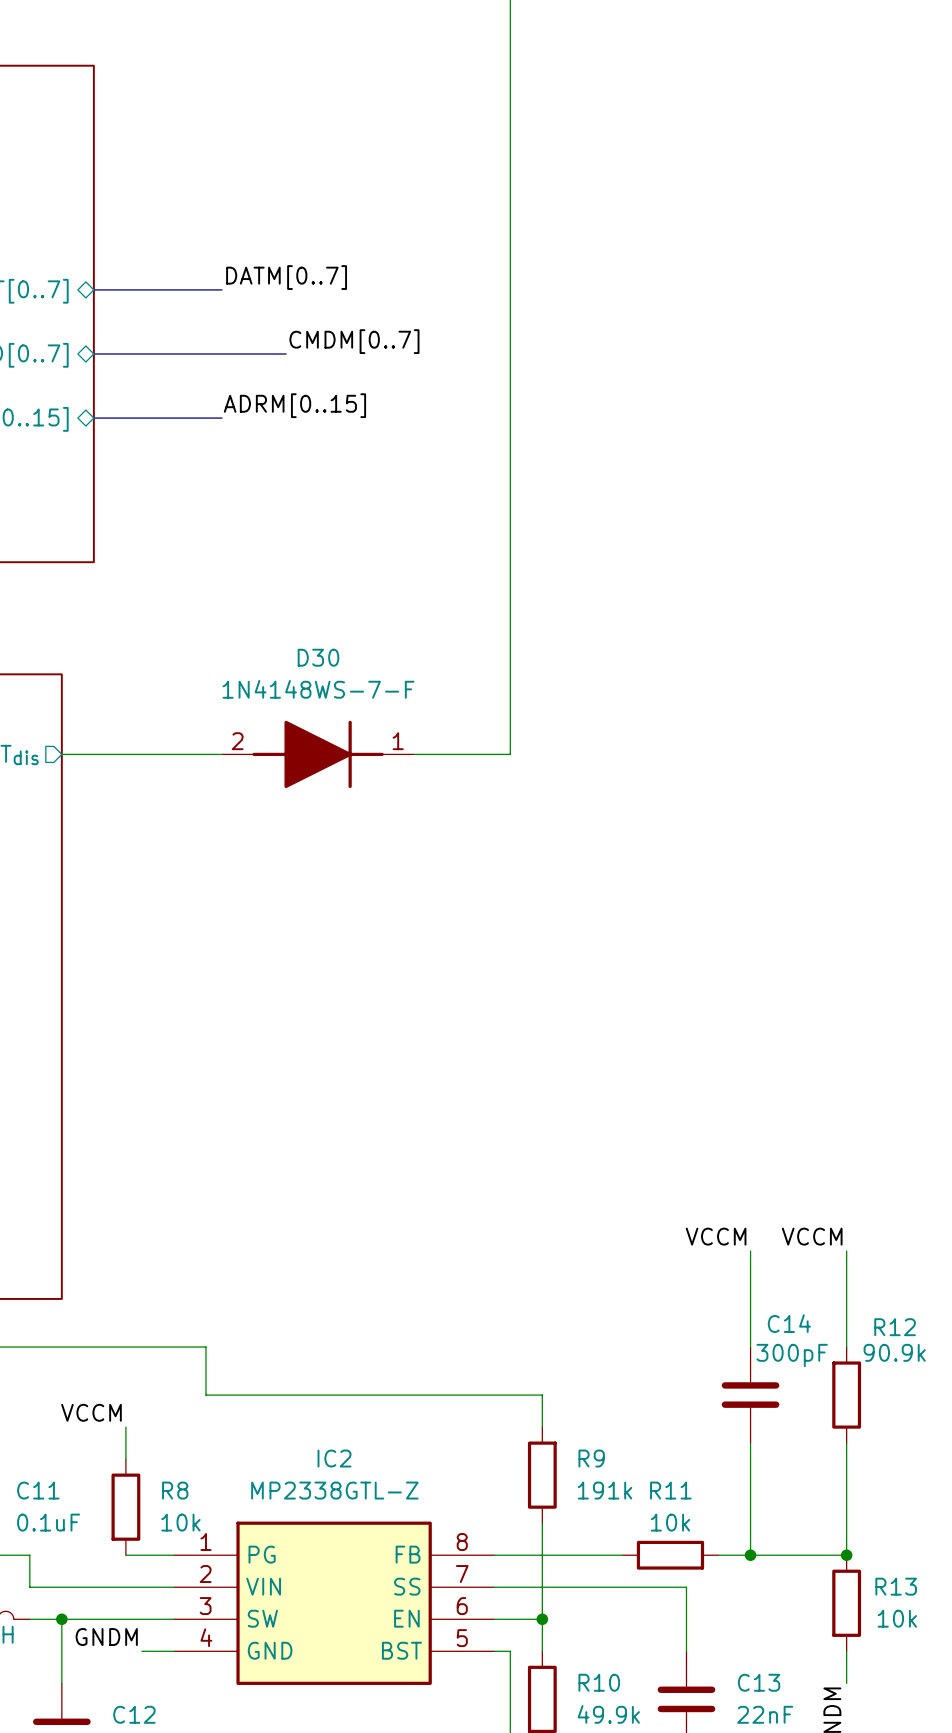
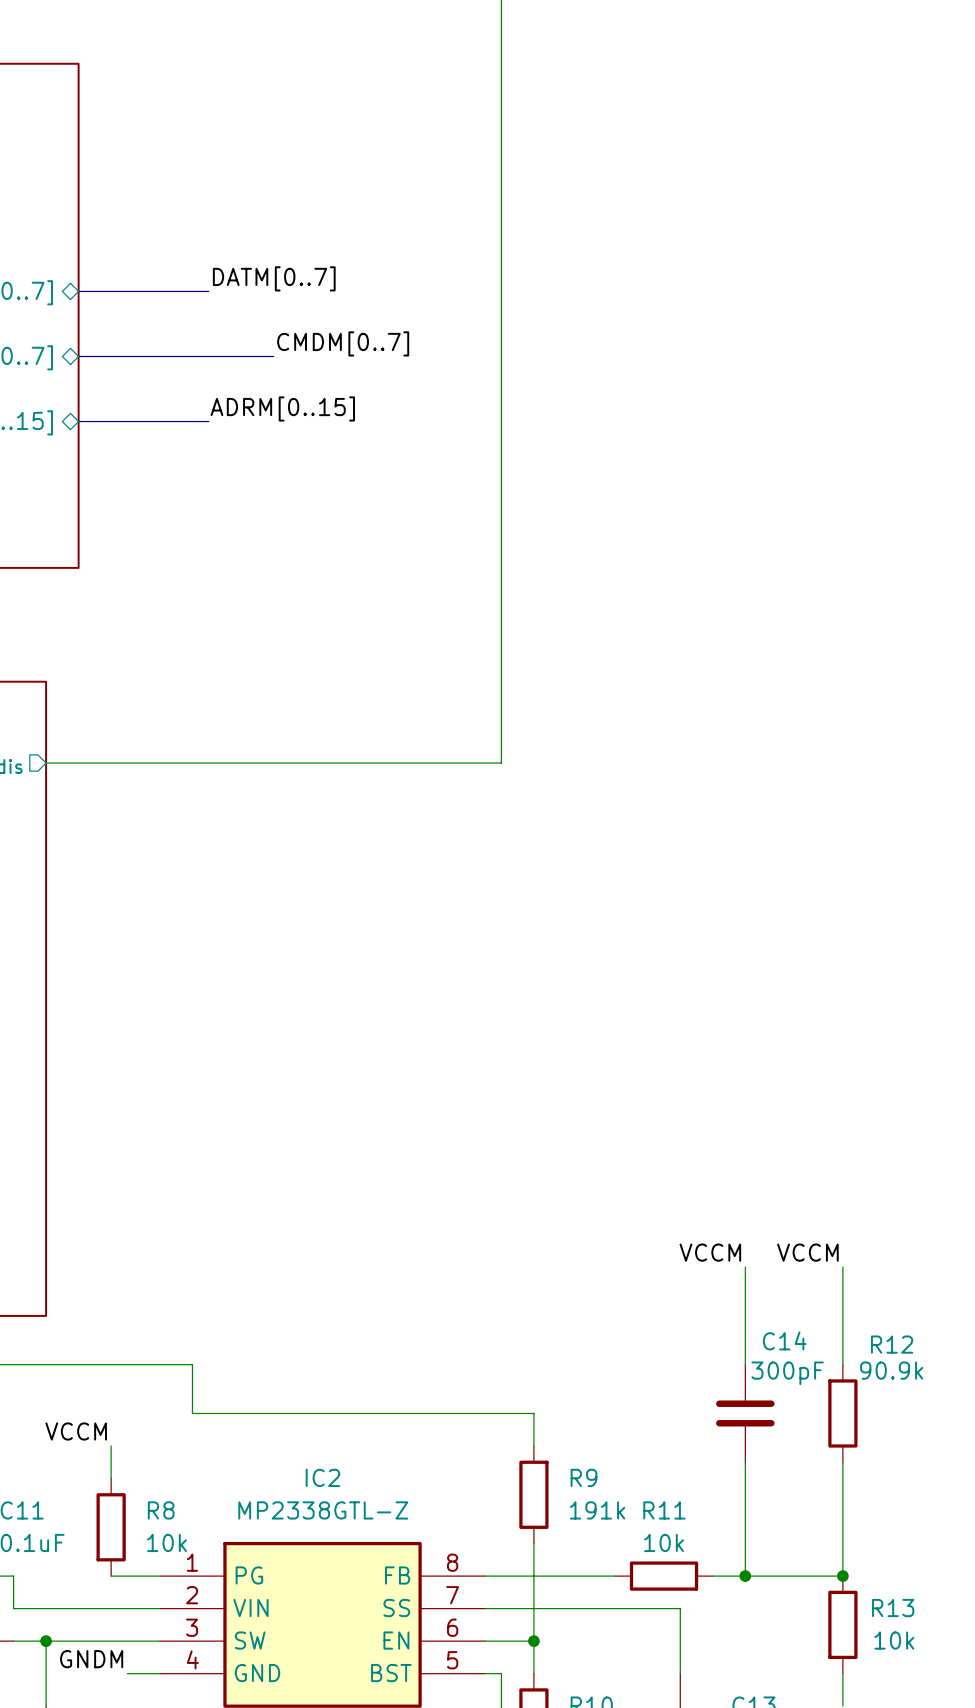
D30: 1N4148WS-7-F (318, 754) -> none

